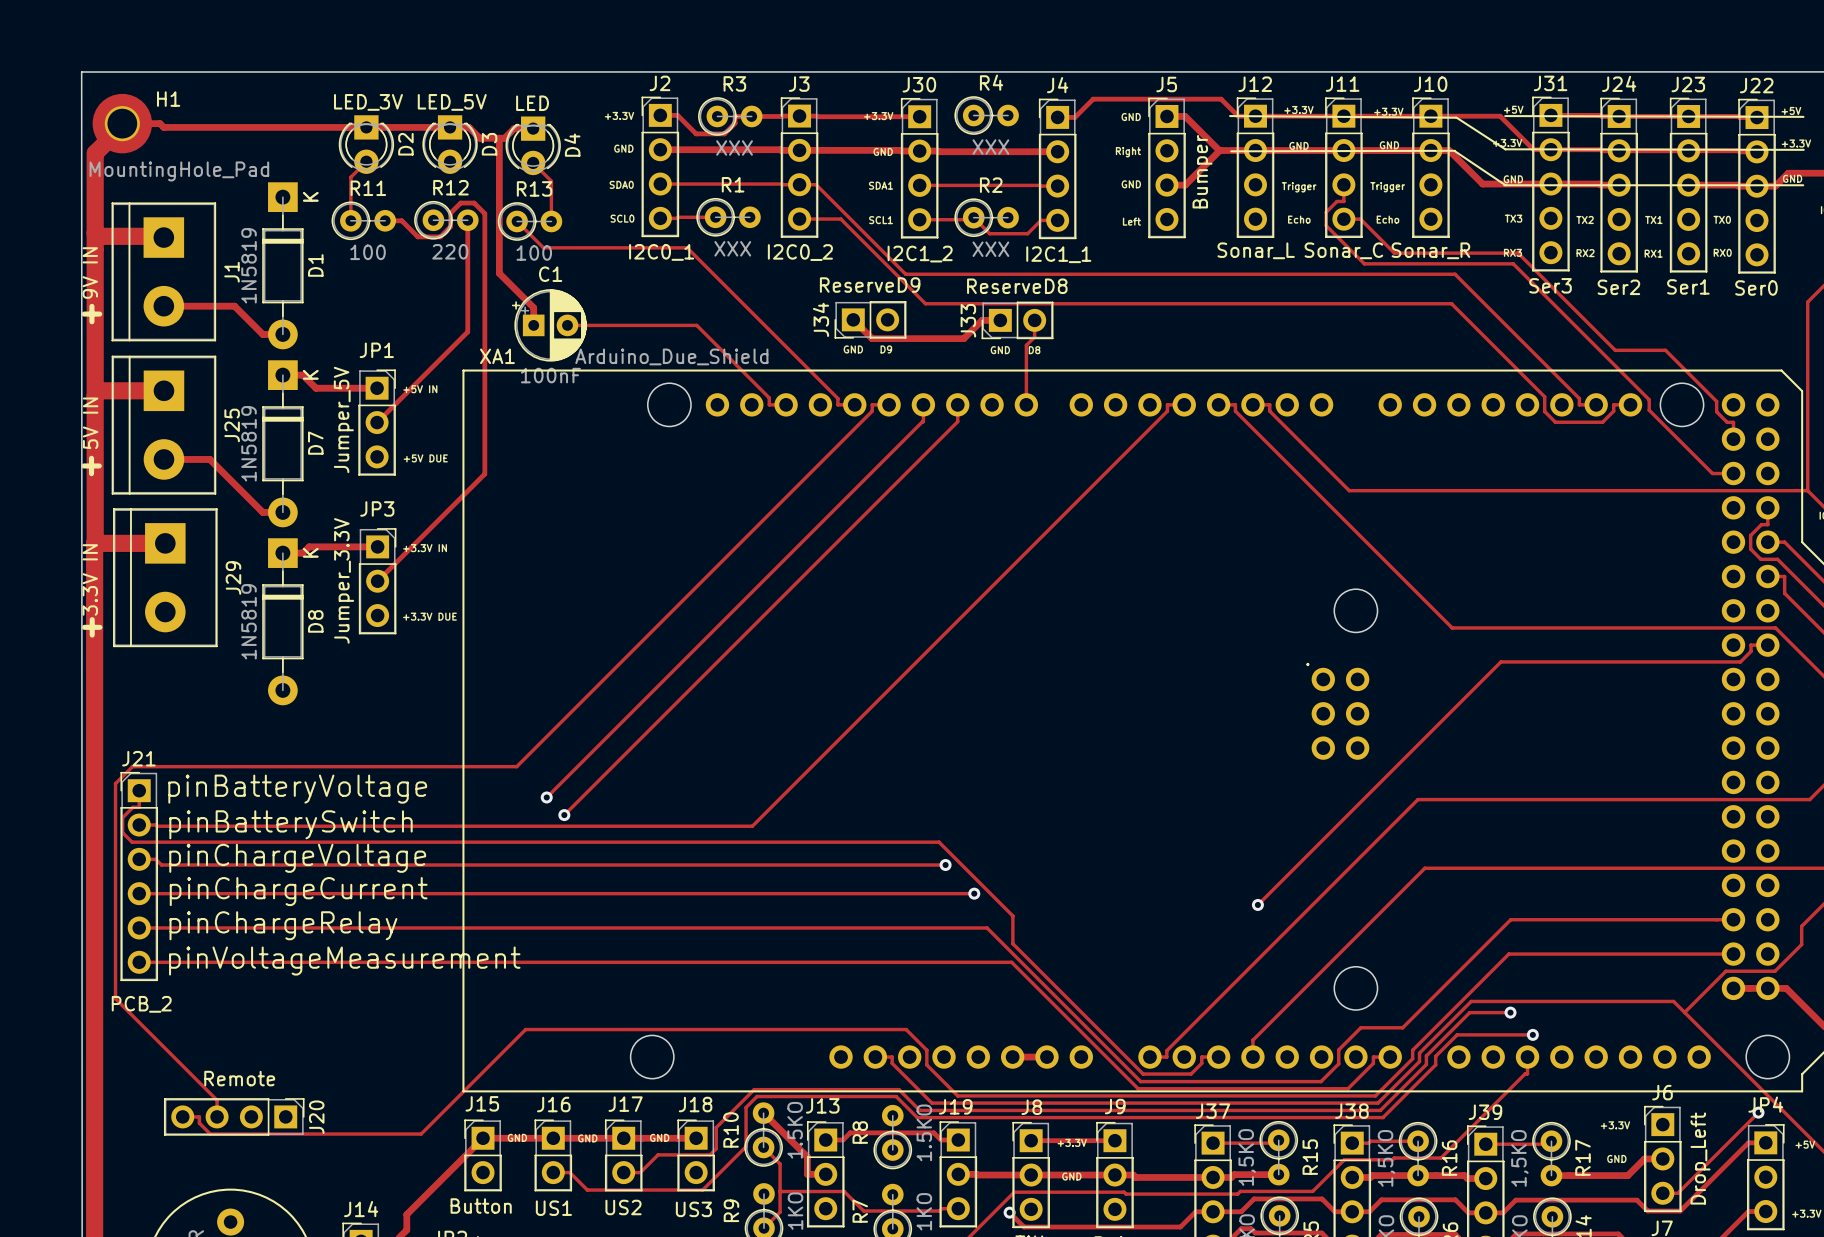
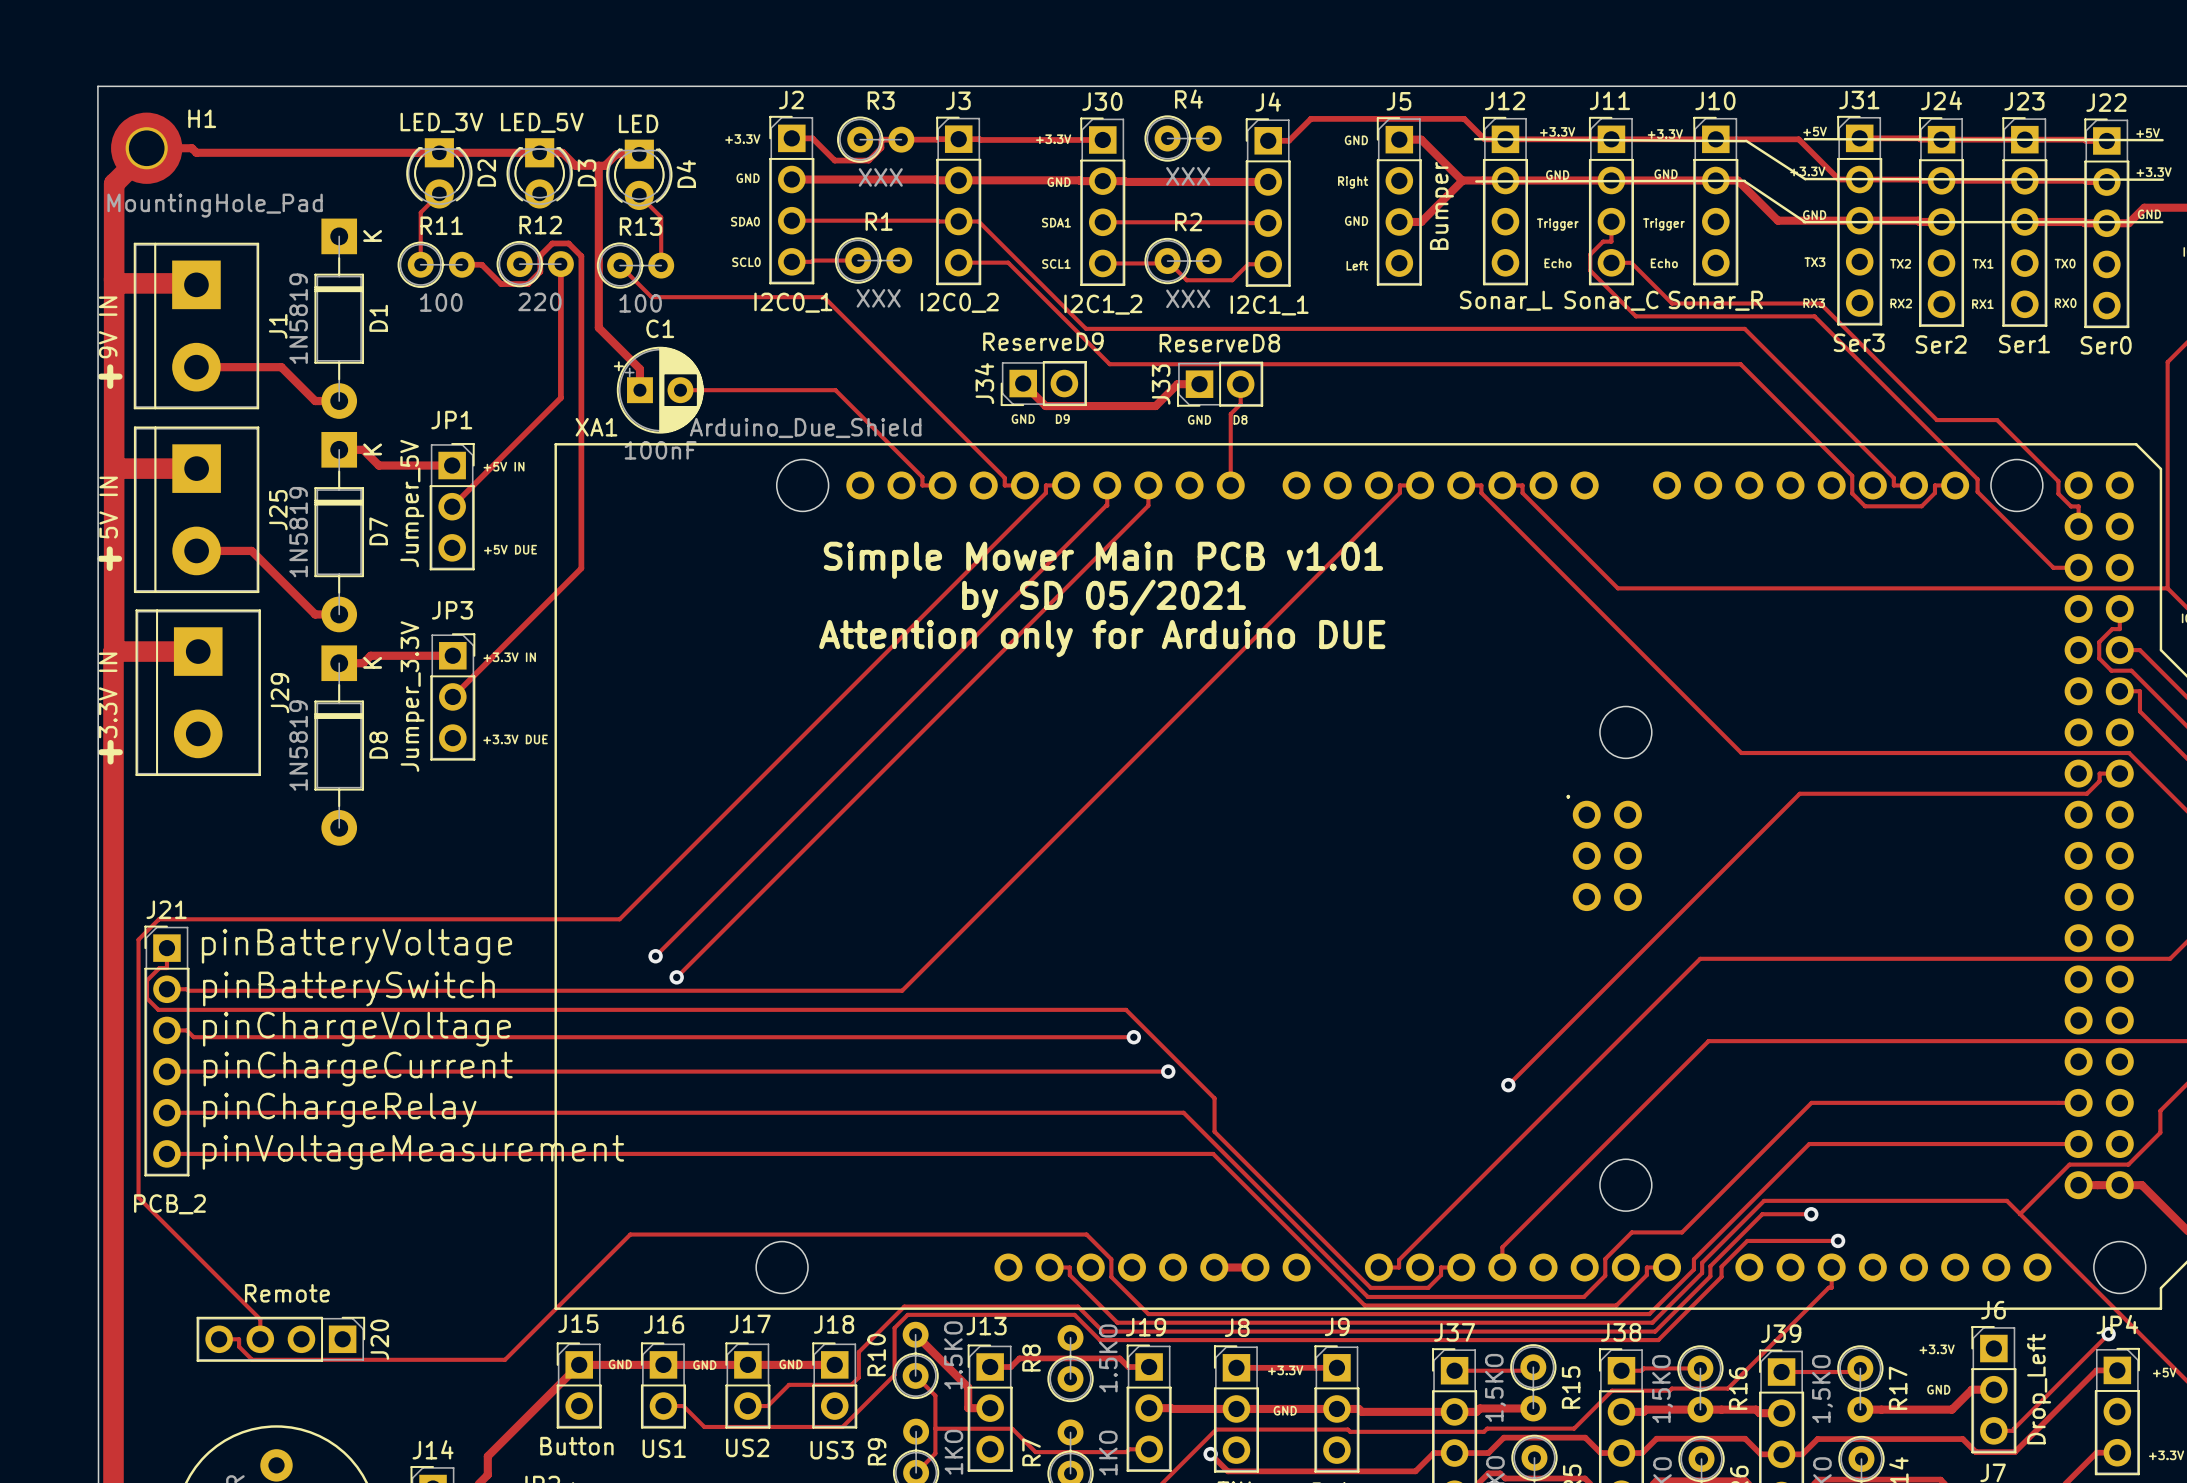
text: none -> Simple Mower Main PCB v1.01 (1103, 560)
text: none -> by SD 05/2021 (1104, 598)
text: none -> Attention only for Arduino DUE (1102, 638)

